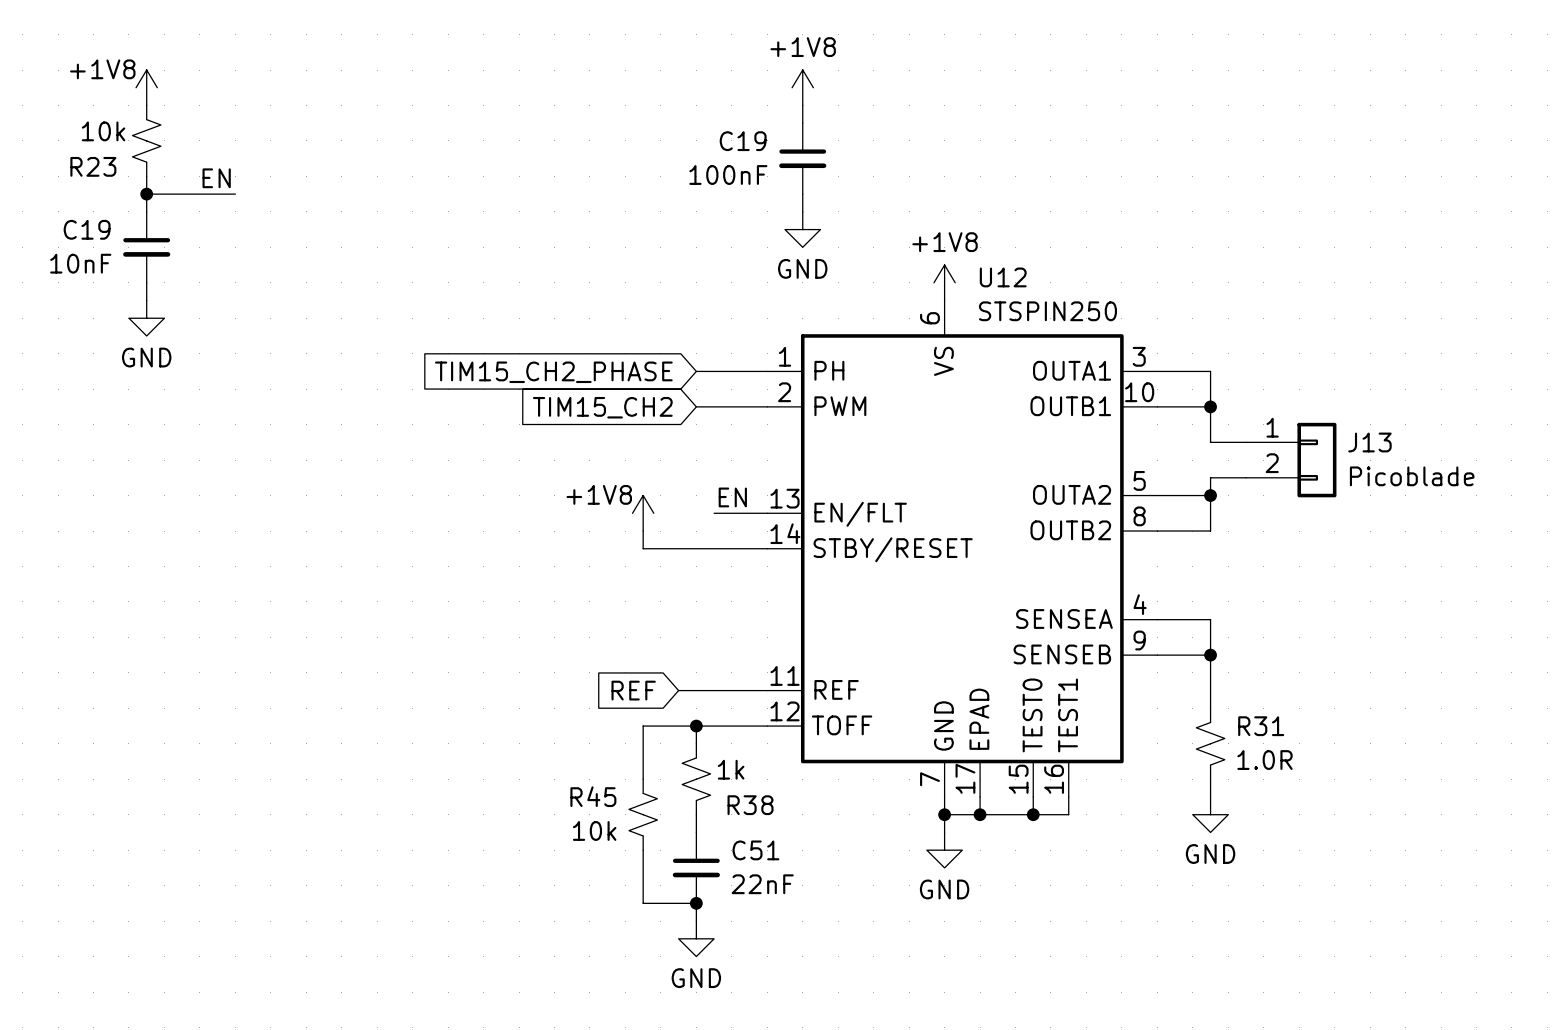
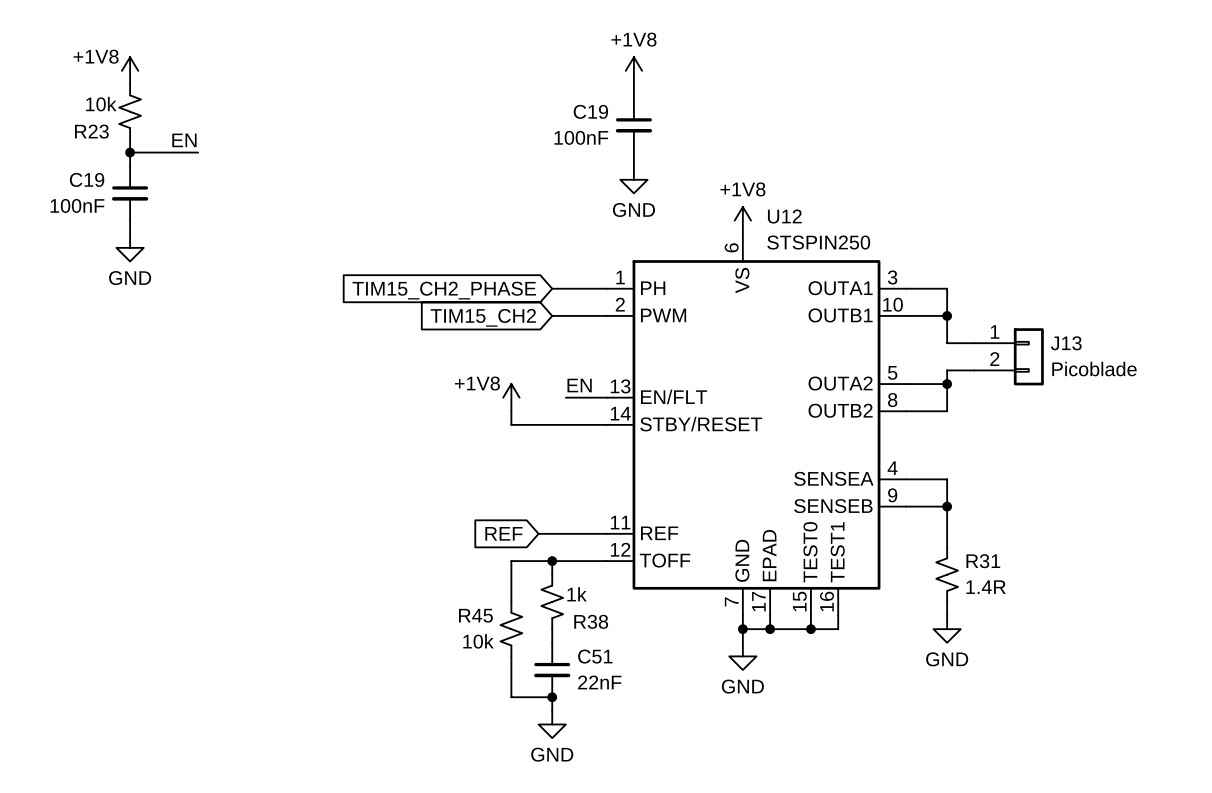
C19 value: 10nF (80, 263) -> 100nF (77, 205)
R31 value: 1.0R (1264, 760) -> 1.4R (986, 587)

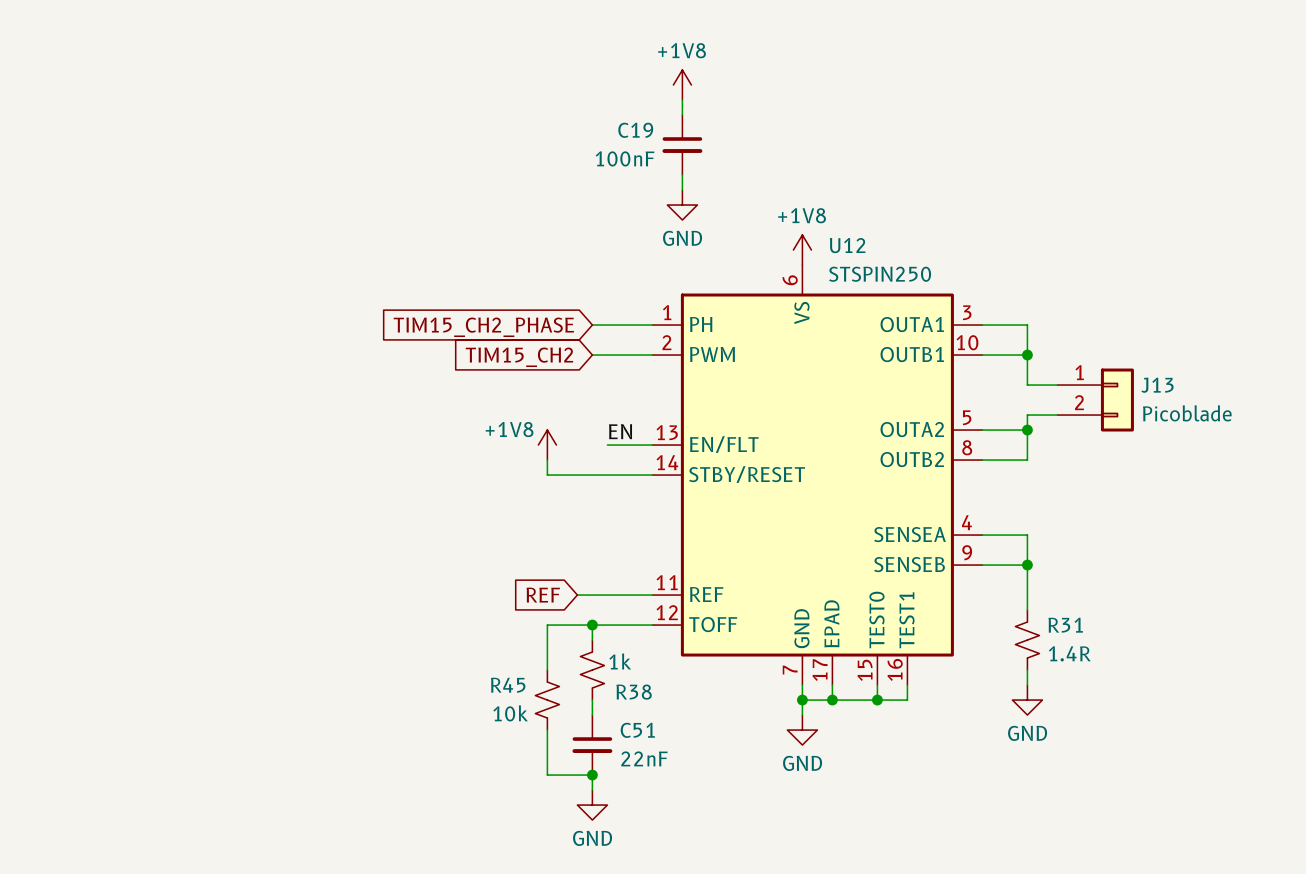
power symbol: +1V8 (130, 70) -> none
R23: 10k (130, 111) -> none
wire: (130, 138) (130, 166) -> none
label: EN (184, 140) -> none
wire: (130, 152) (198, 152) -> none
junction: (130, 152) -> none
C19: 100nF (130, 193) -> none
wire: (130, 220) (130, 234) -> none
power symbol: GND (130, 247) -> none

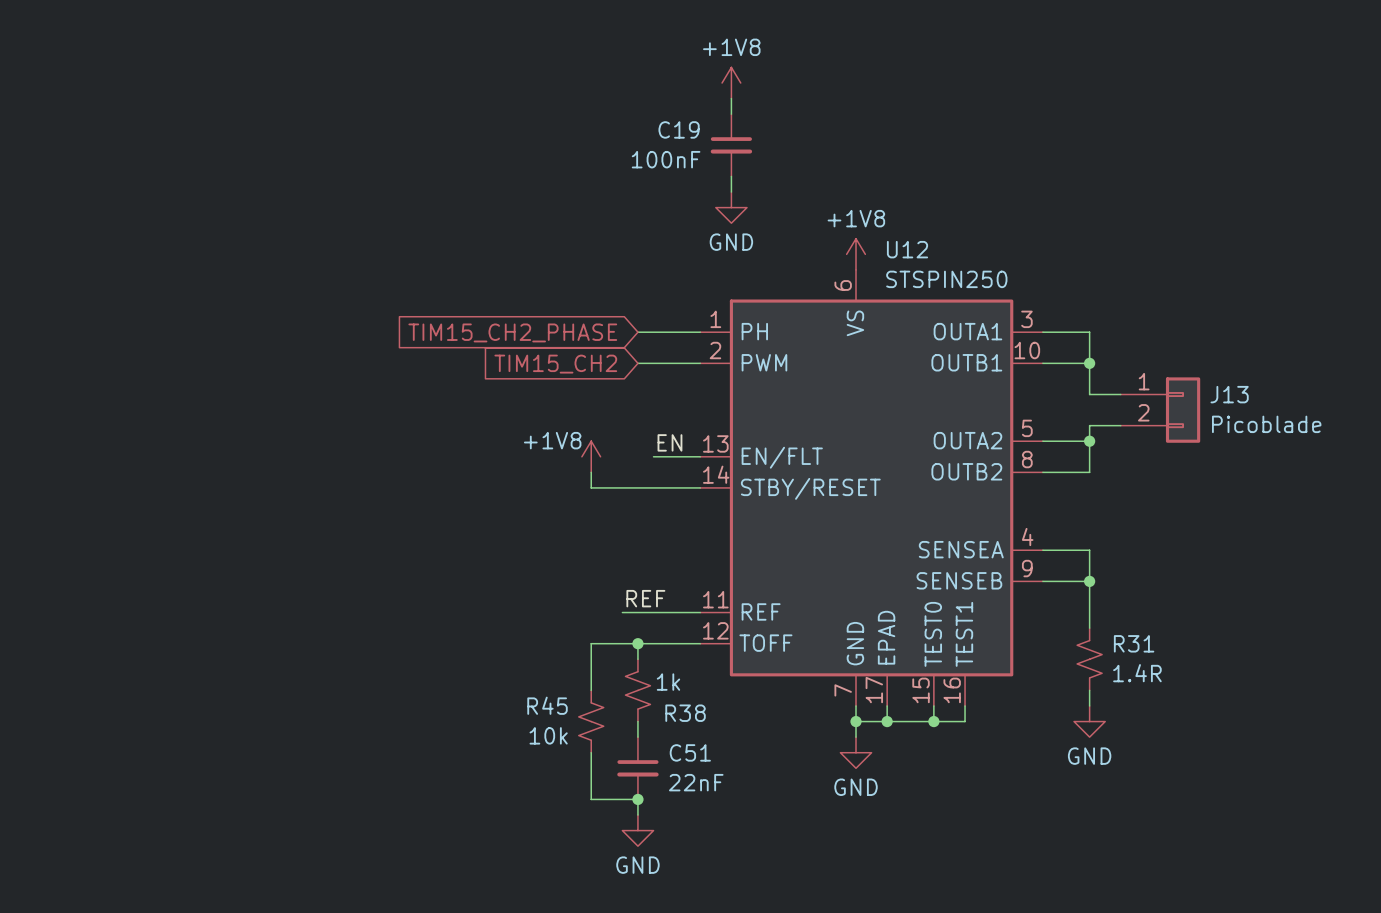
label: none -> REF (645, 598)
global label: REF (543, 595) -> none

